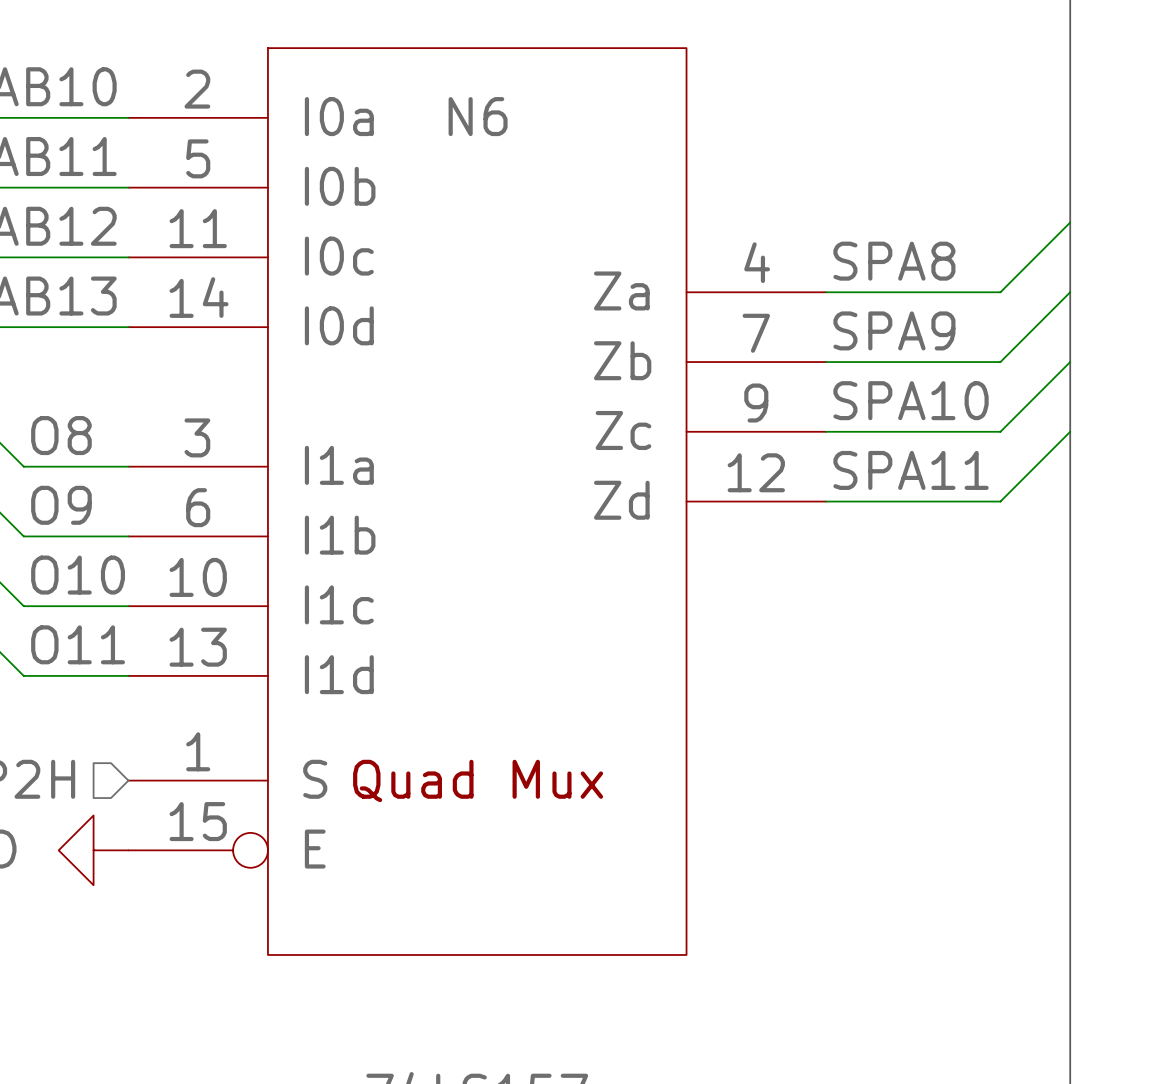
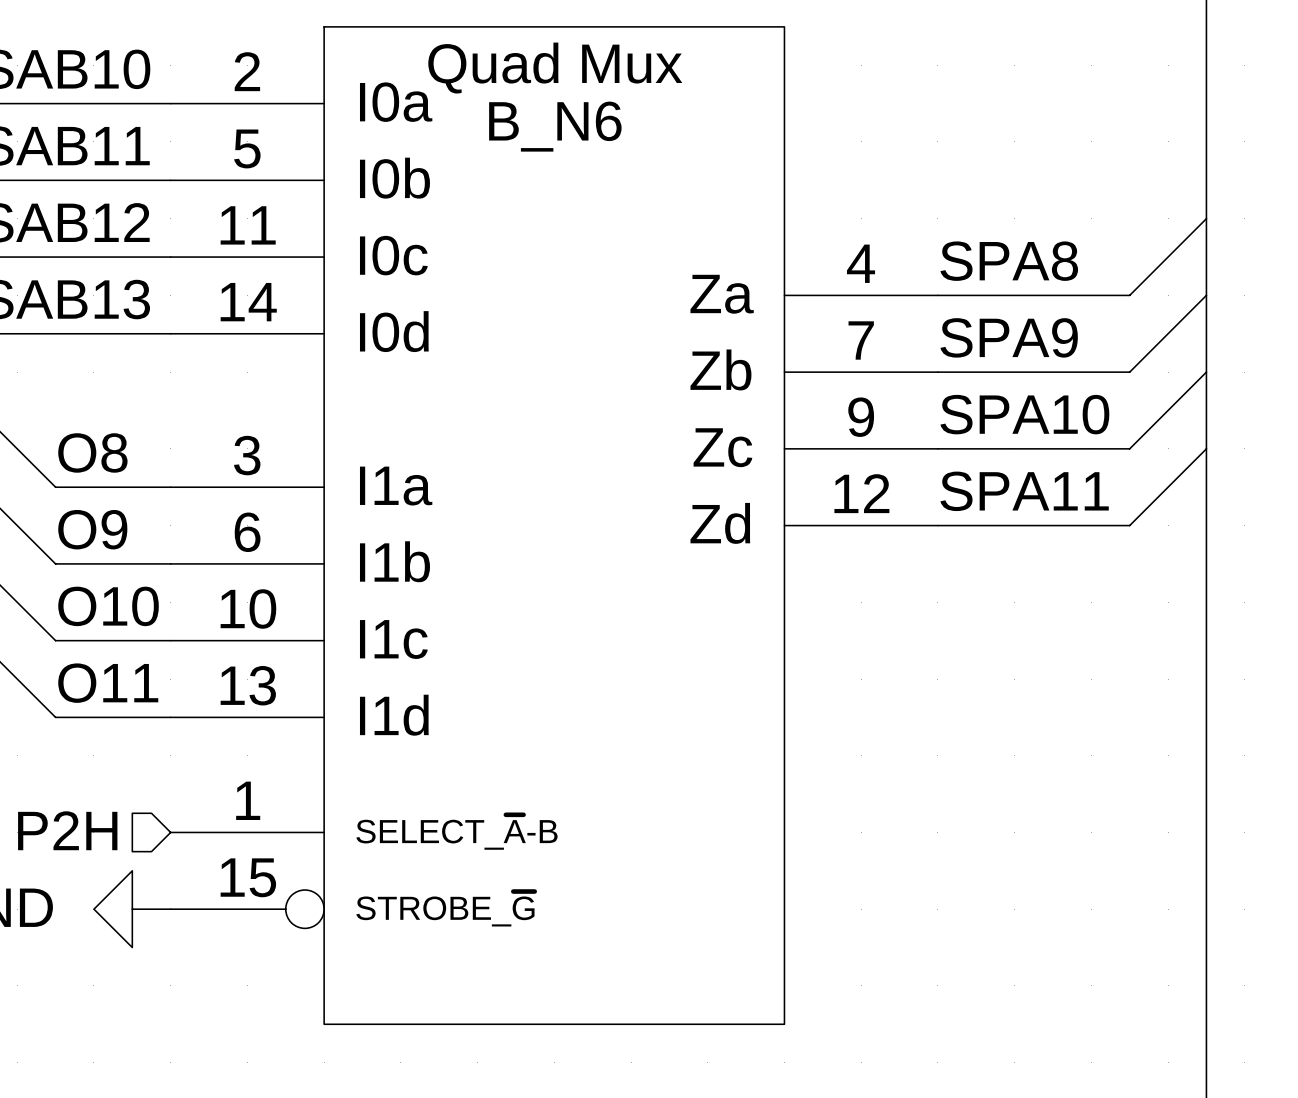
N6 name: N6 (478, 116) -> B_N6 (555, 126)
N6 pin name: S (315, 779) -> SELECT_~{A}-B (456, 832)
N6 text position: Quad Mux (478, 780) -> Quad Mux (555, 68)
N6 pin name: E (315, 849) -> STROBE_~{G} (445, 909)

